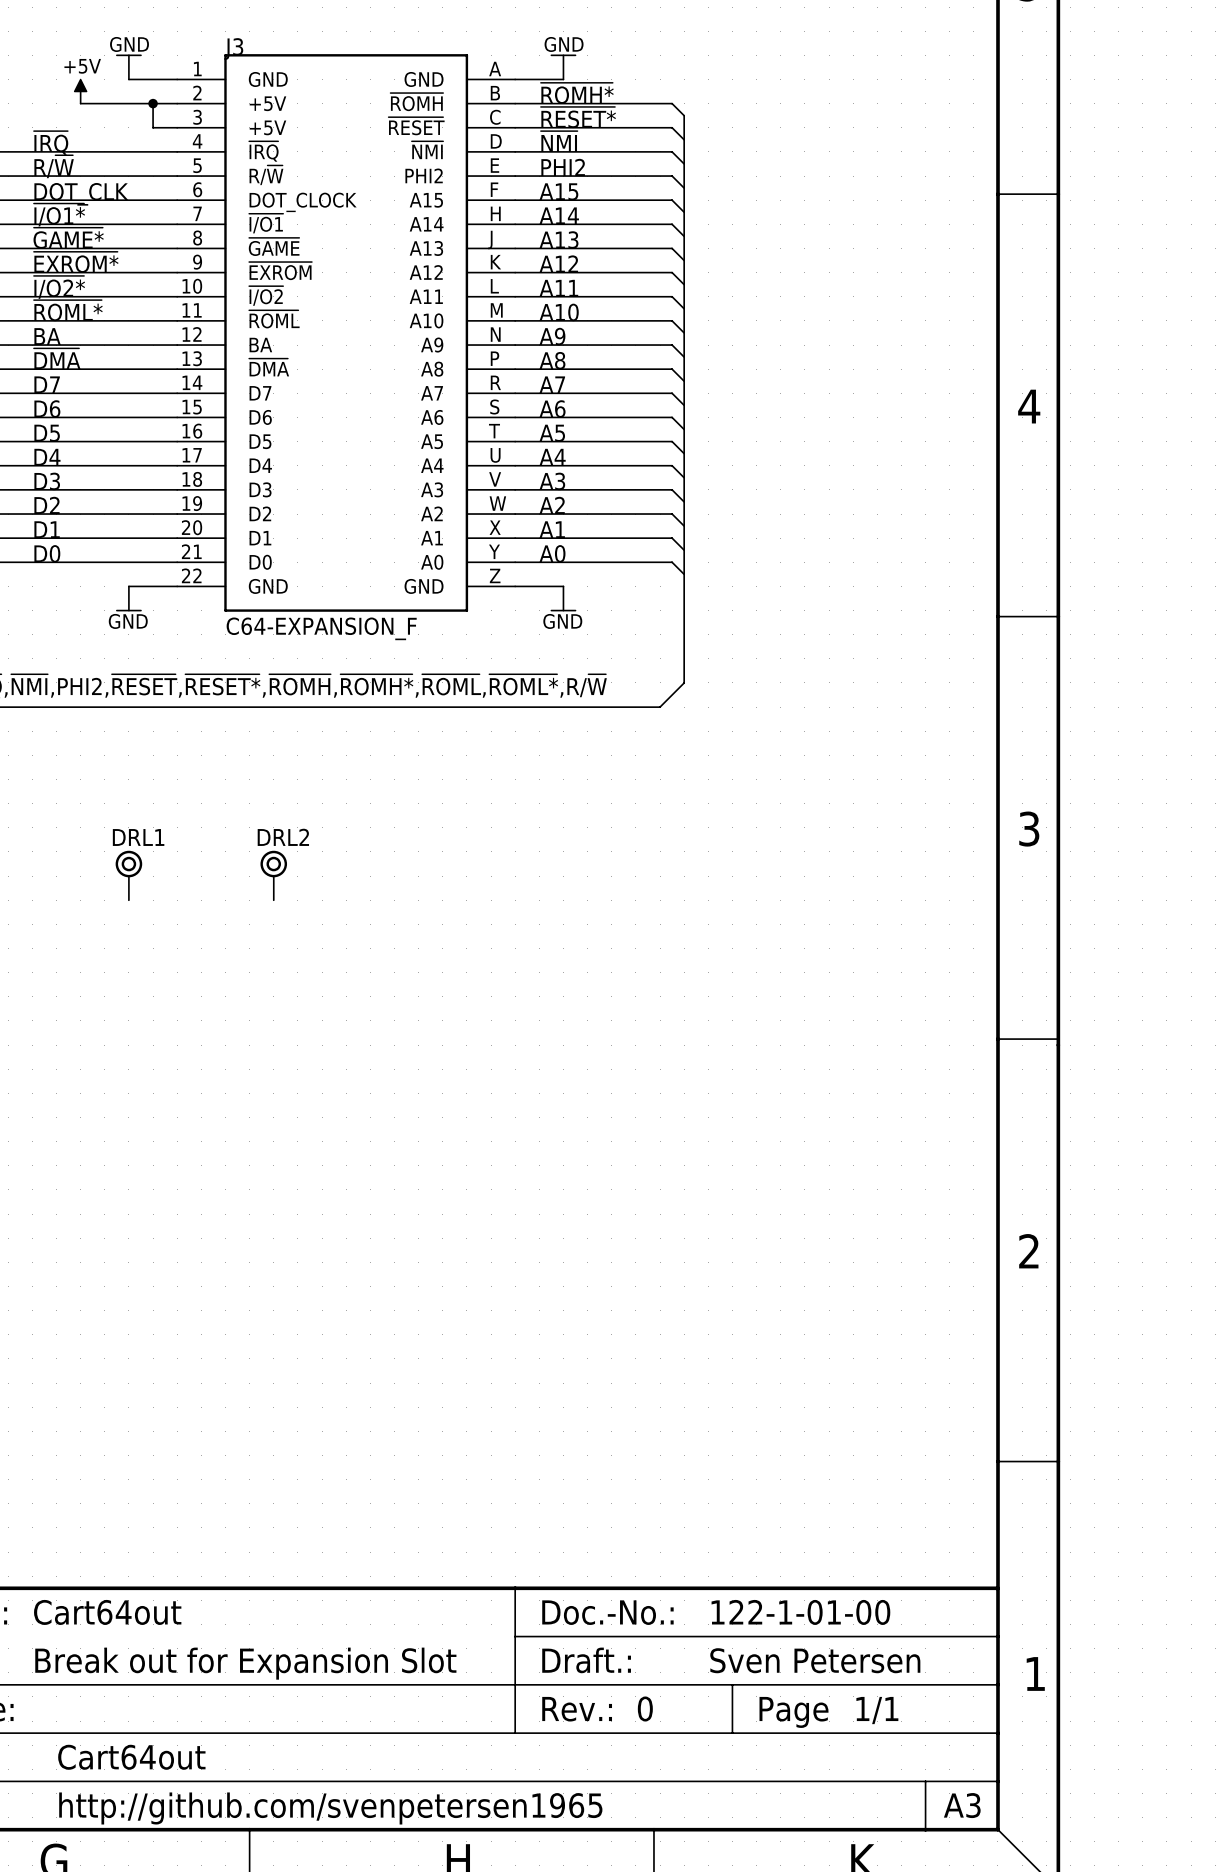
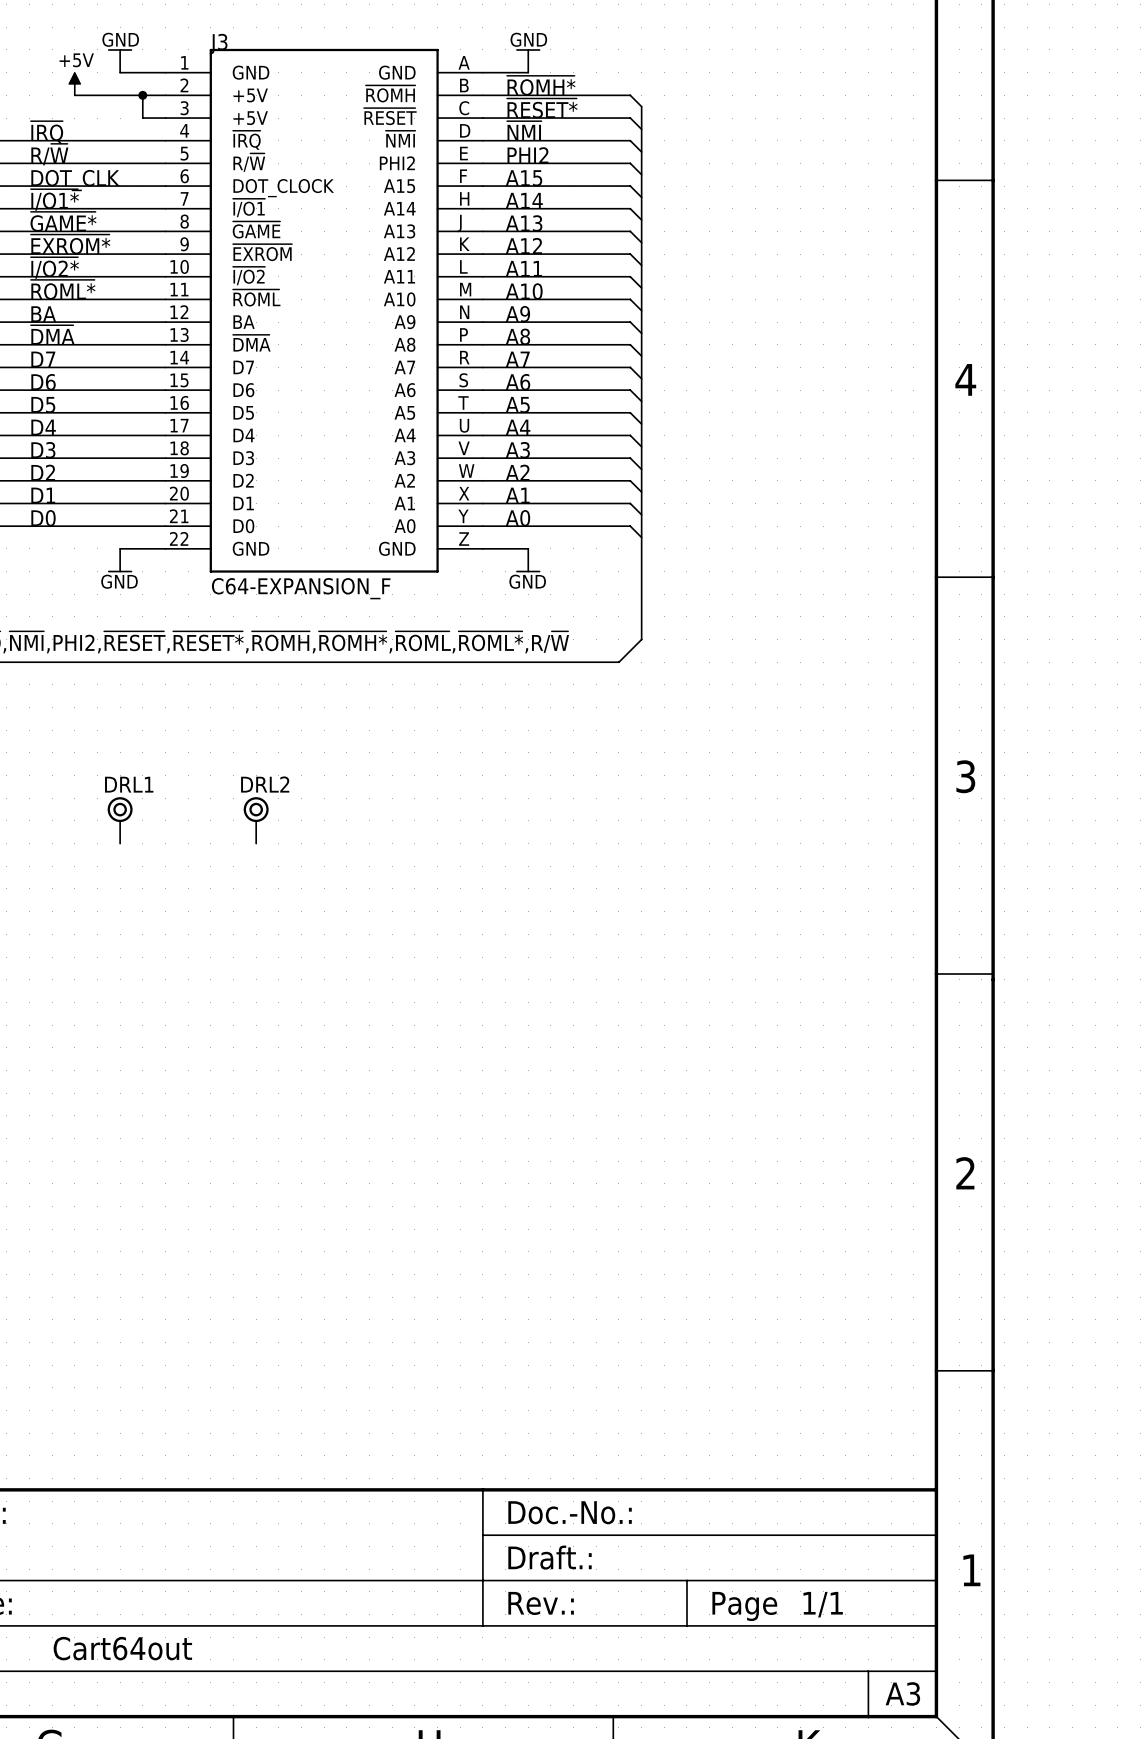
text: Cart64out (107, 1612) -> none
text: 122-1-01-00 (800, 1612) -> none
text: Sven Petersen (815, 1660) -> none
text: Break out for Expansion Slot (245, 1663) -> none
text: 0 (645, 1709) -> none
text: http://github.com/svenpetersen1965 (330, 1808) -> none

